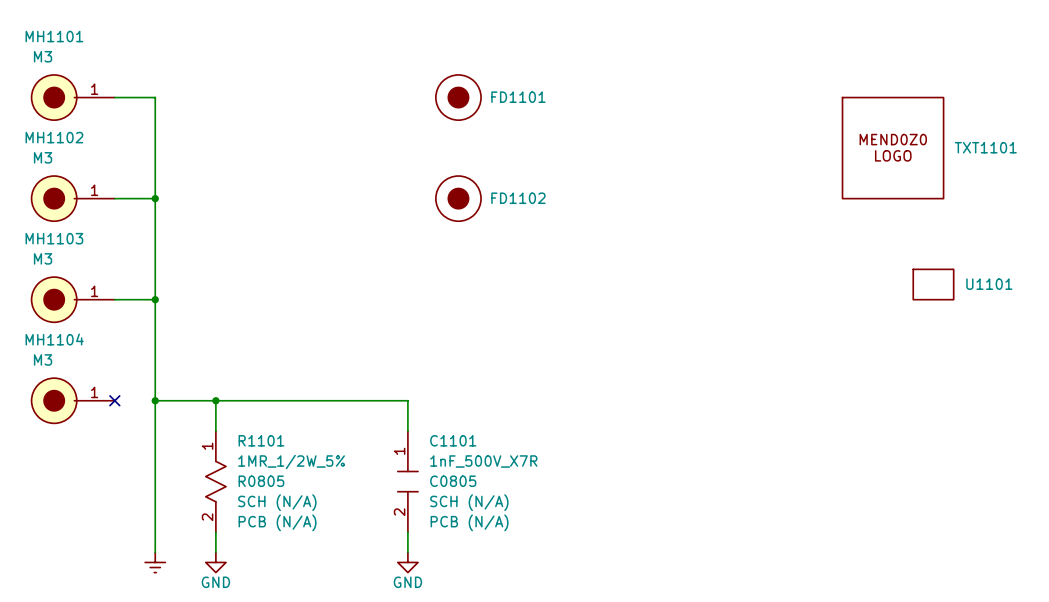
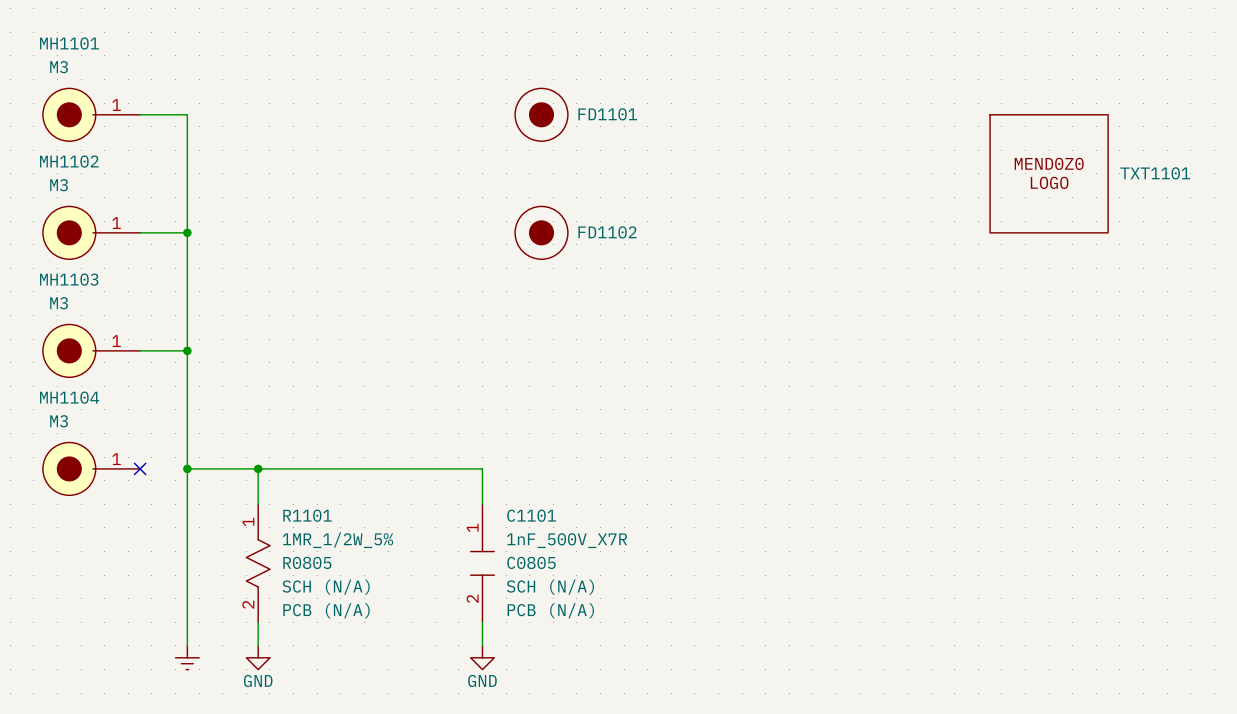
U1101: (933, 284) -> none

